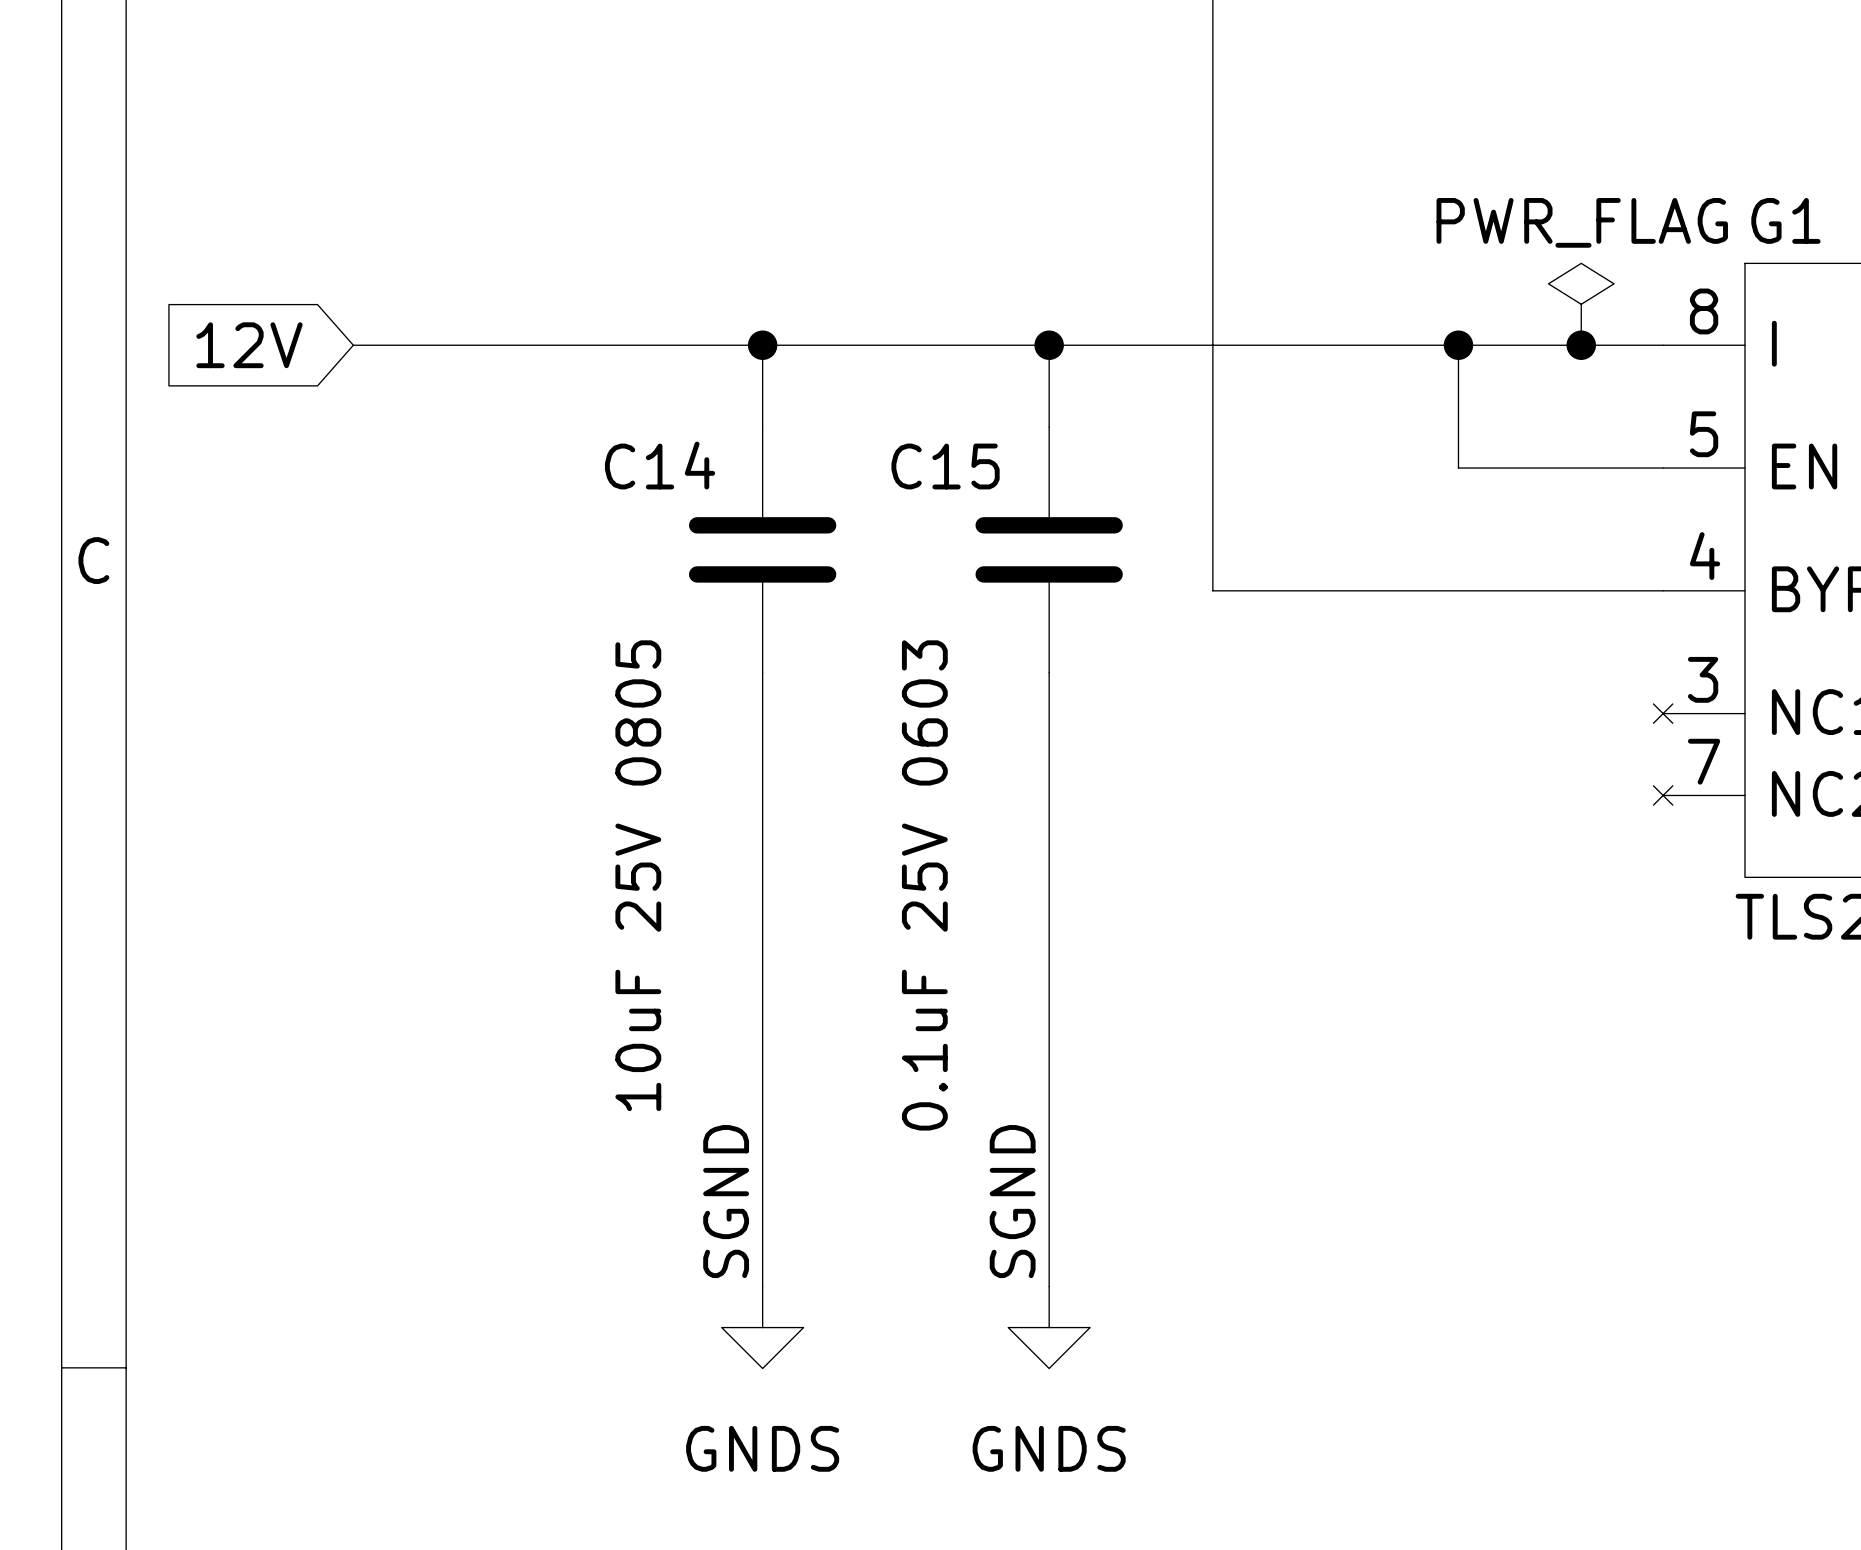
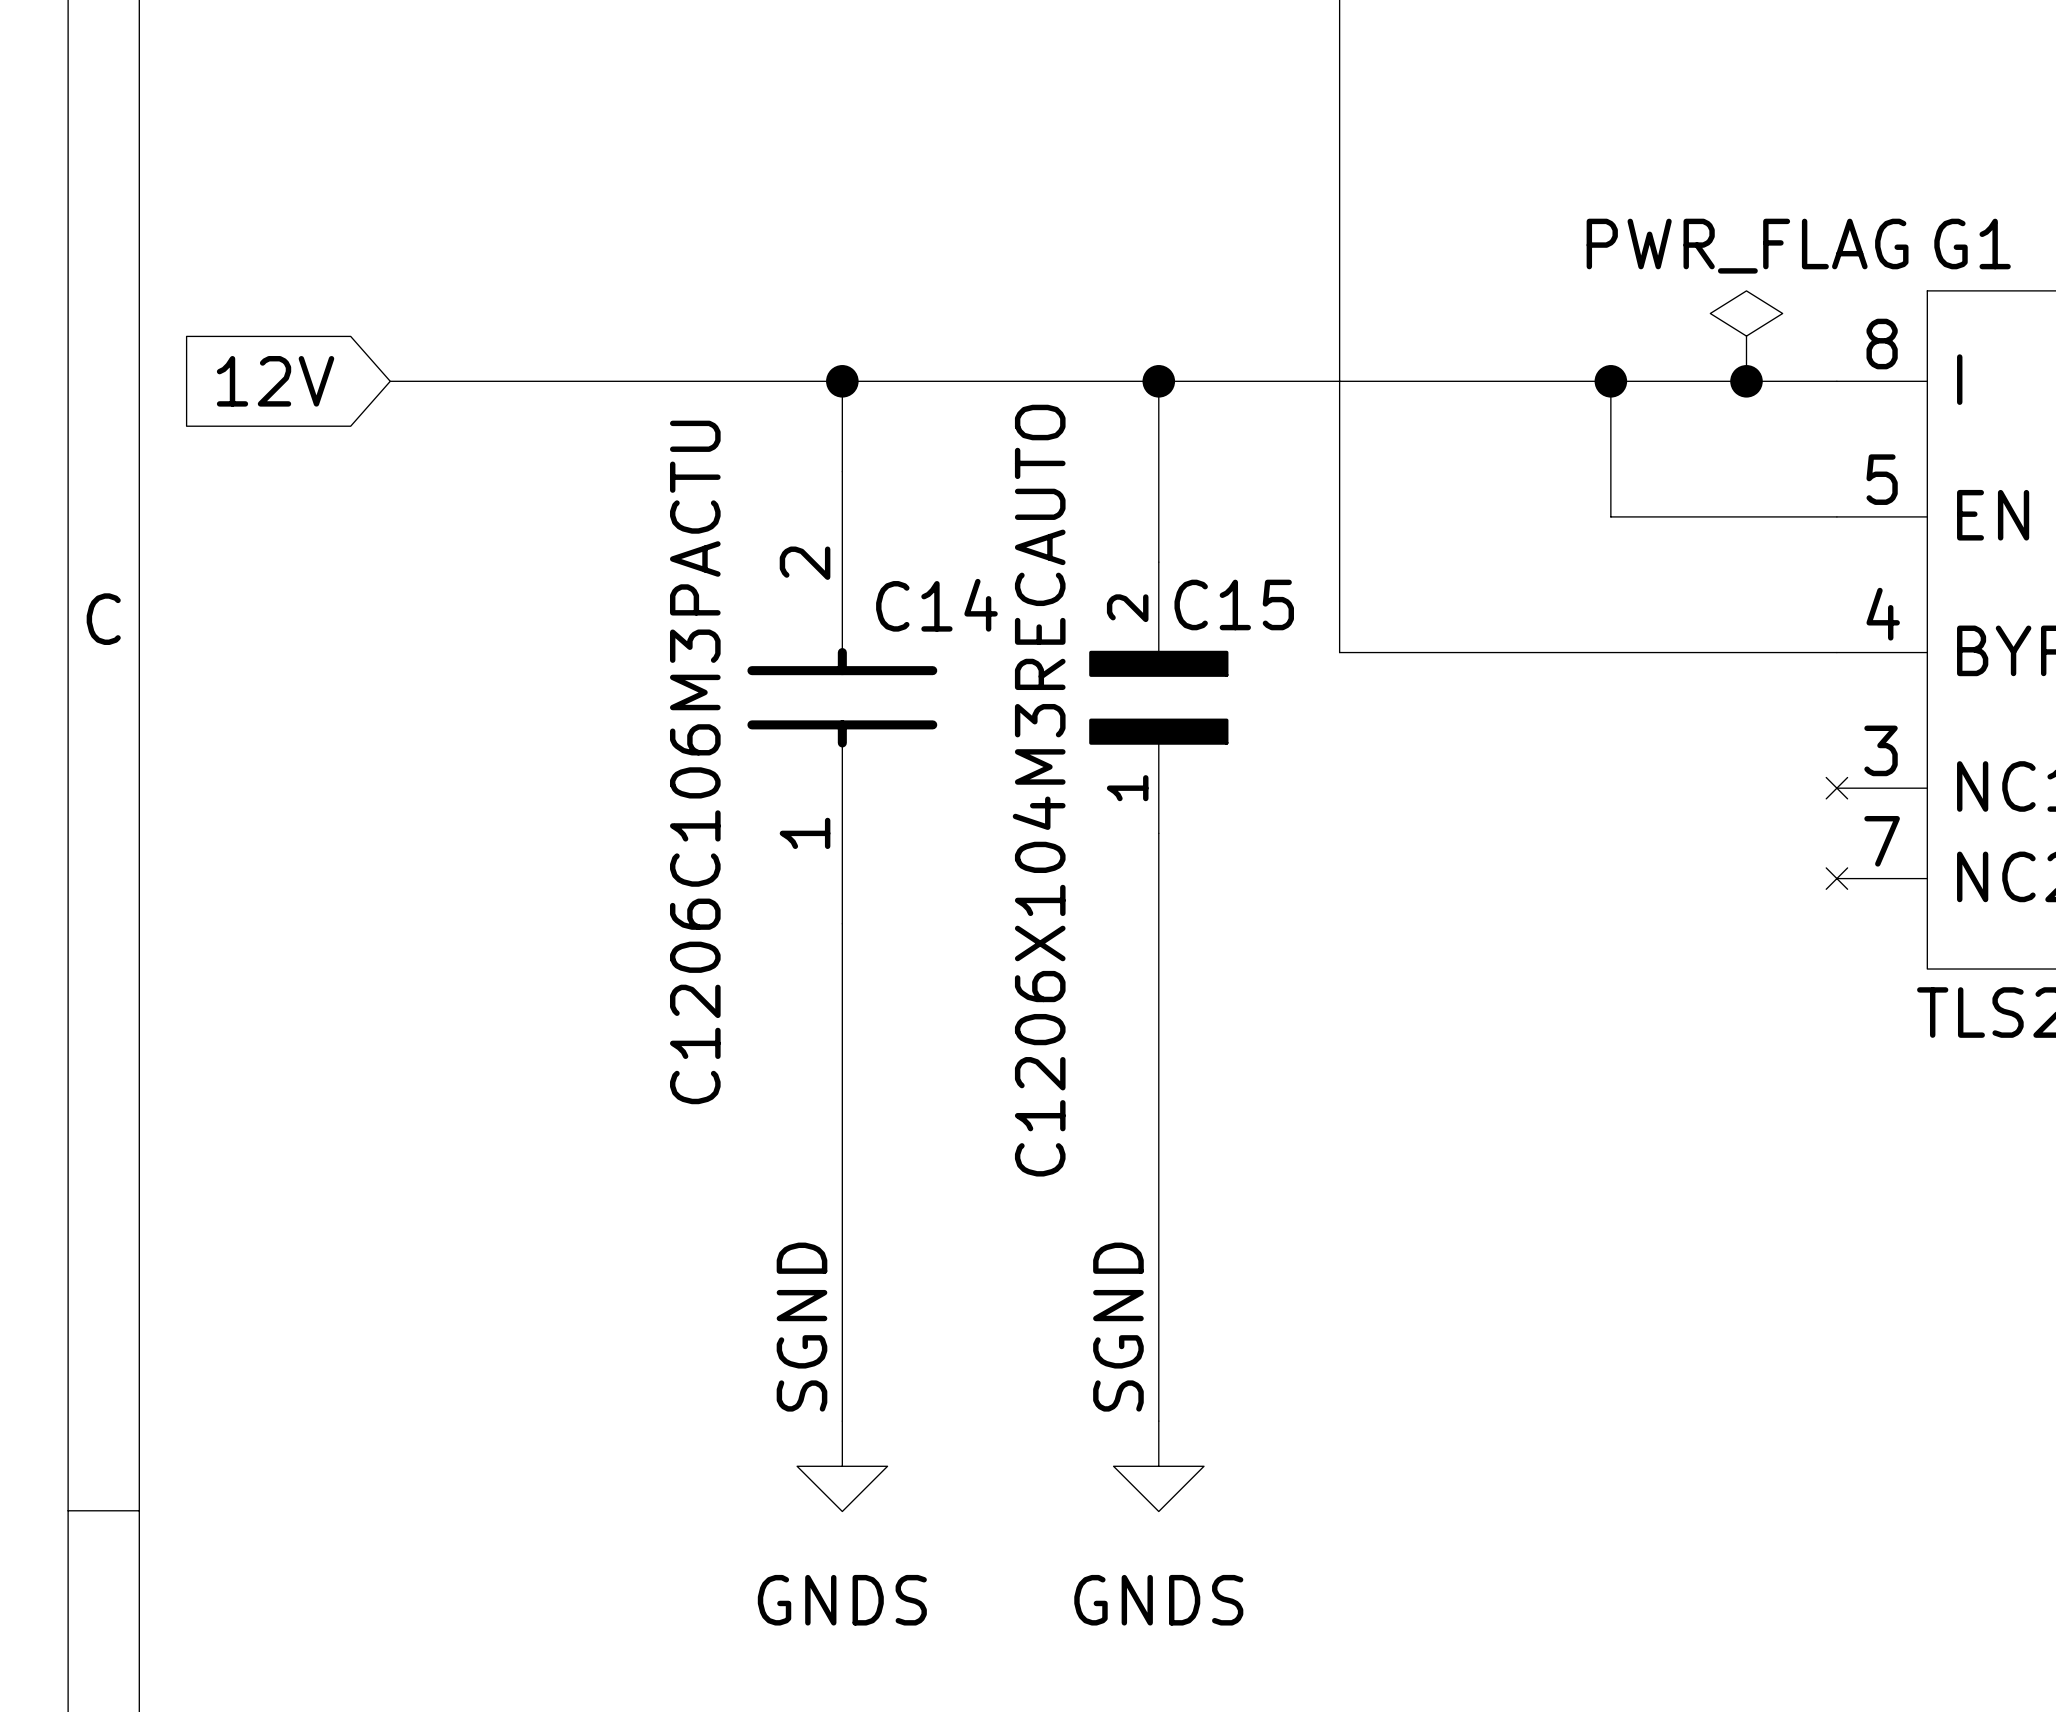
C14 symbol: [688, 427, 837, 673] -> [747, 471, 938, 924]
C15 symbol: [975, 427, 1123, 673] -> [1089, 562, 1229, 834]
C14 name position: C14 (660, 465) -> C14 (936, 605)
C15 name position: C15 (945, 466) -> C15 (1234, 604)
C14 value: 10uF 25V 0805 (638, 875) -> C1206C106M3PACTU (695, 762)
C15 value: 0.1uF 25V 0603 (924, 885) -> C1206X104M3RECAUTO (1039, 790)

